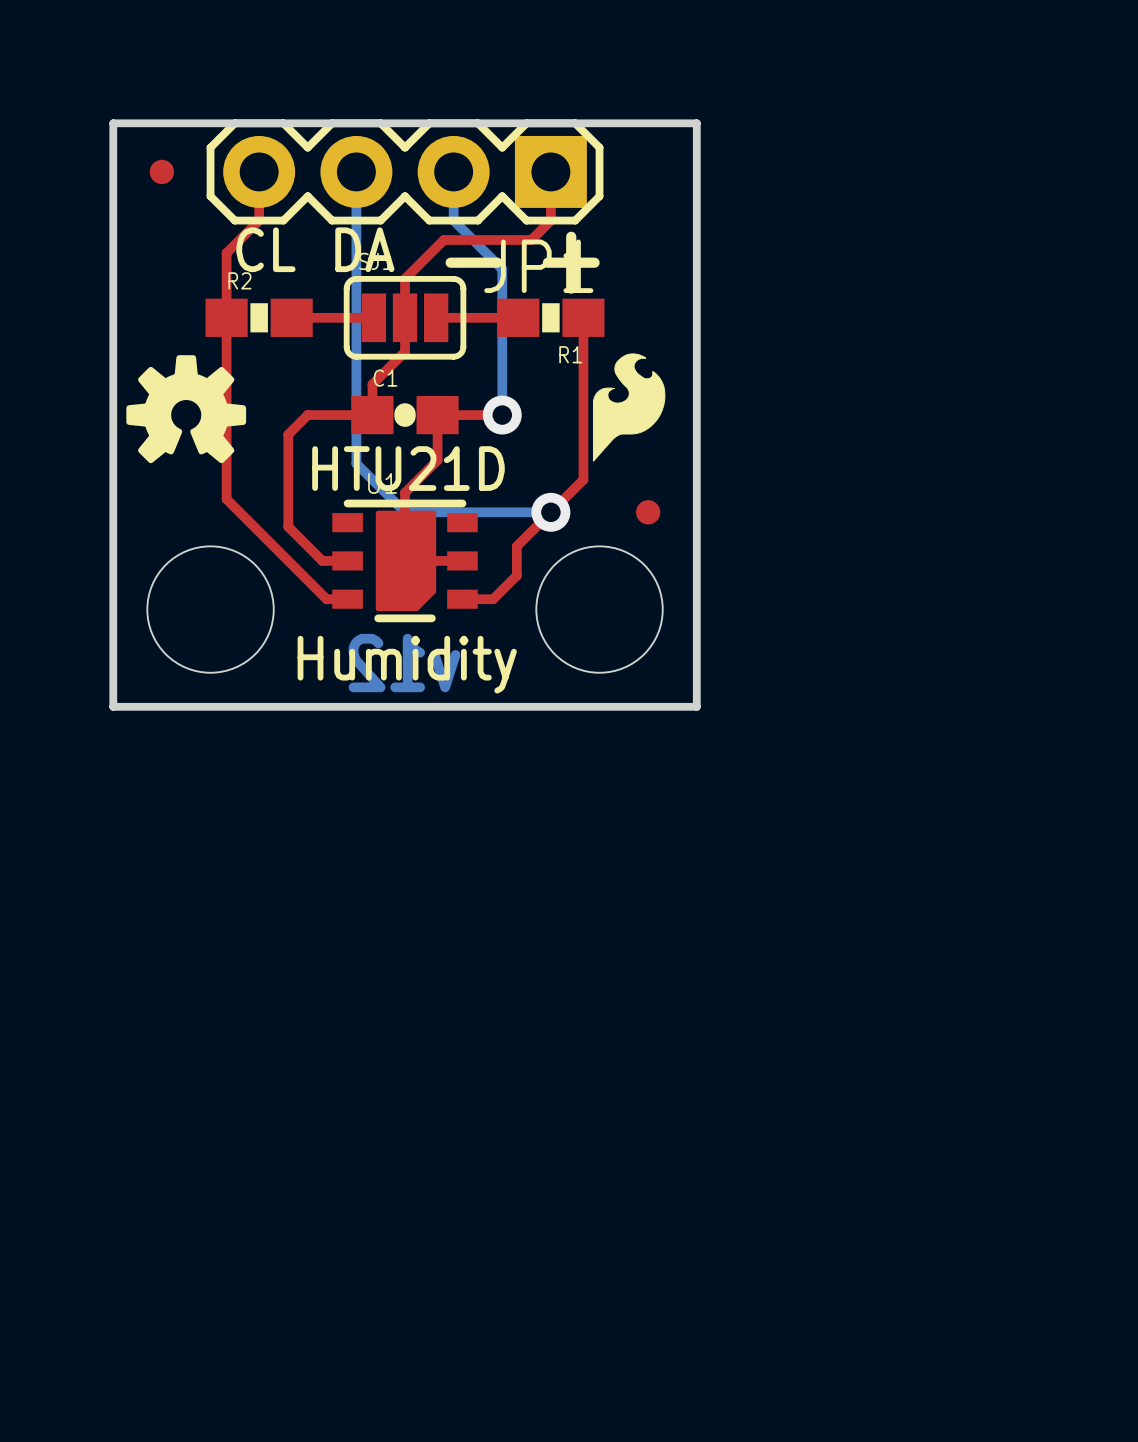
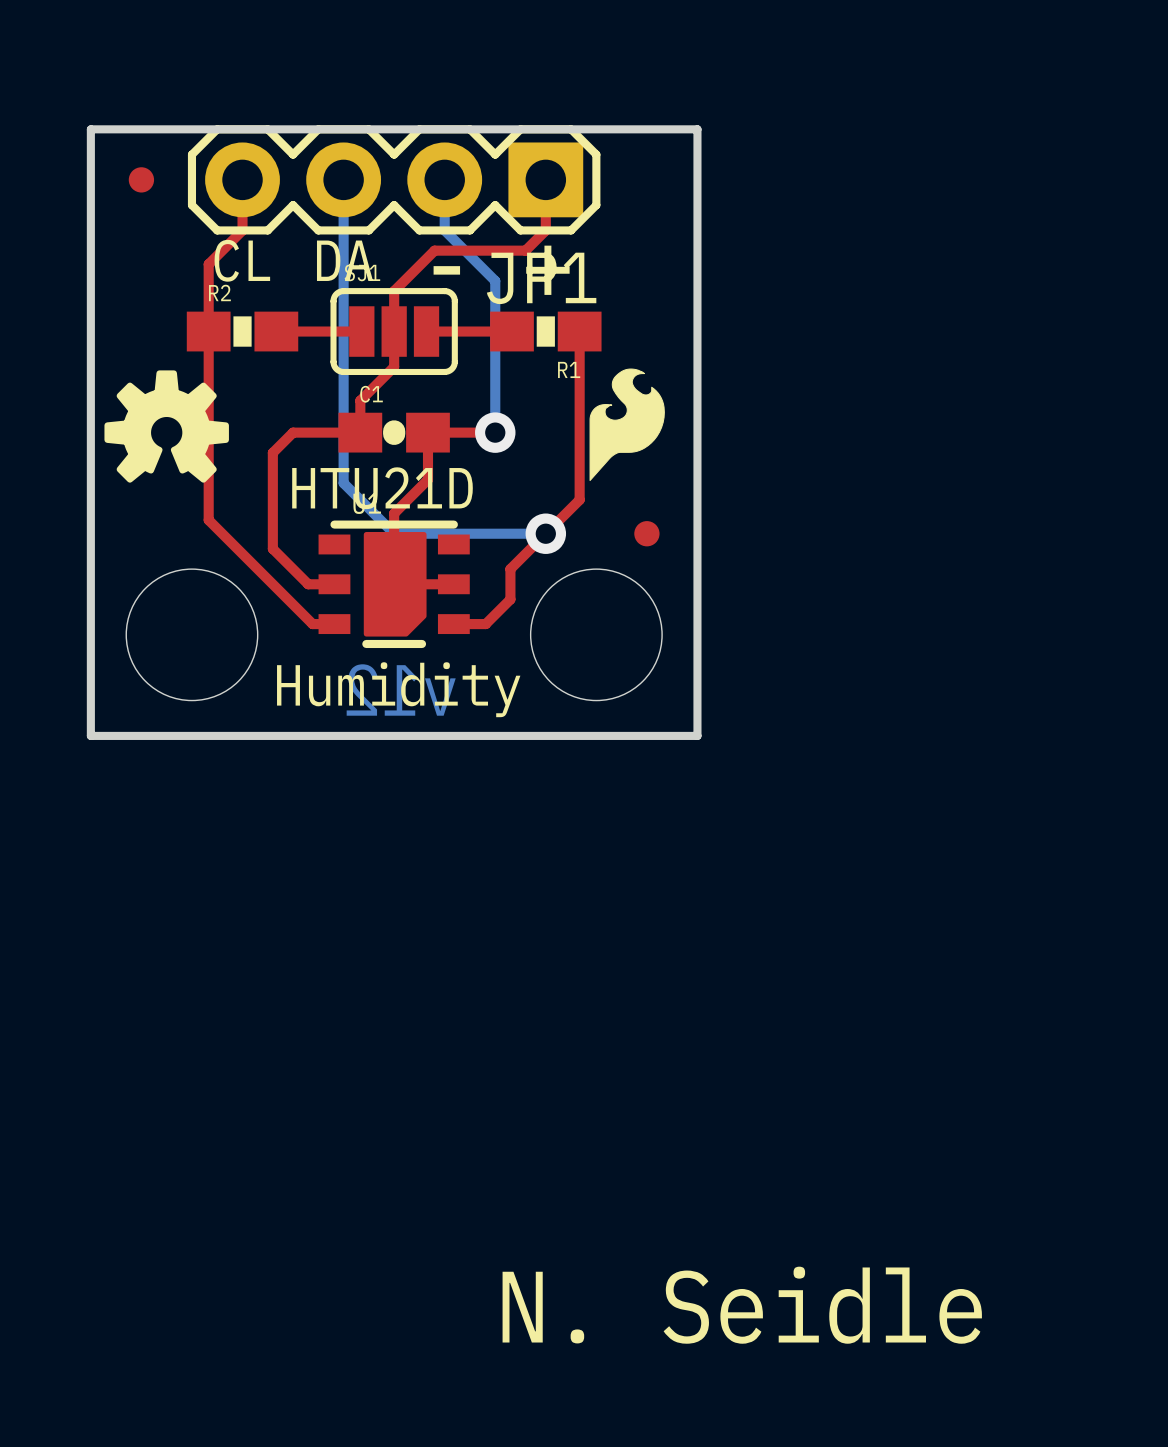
text: none -> N. Seidle (742, 1305)

